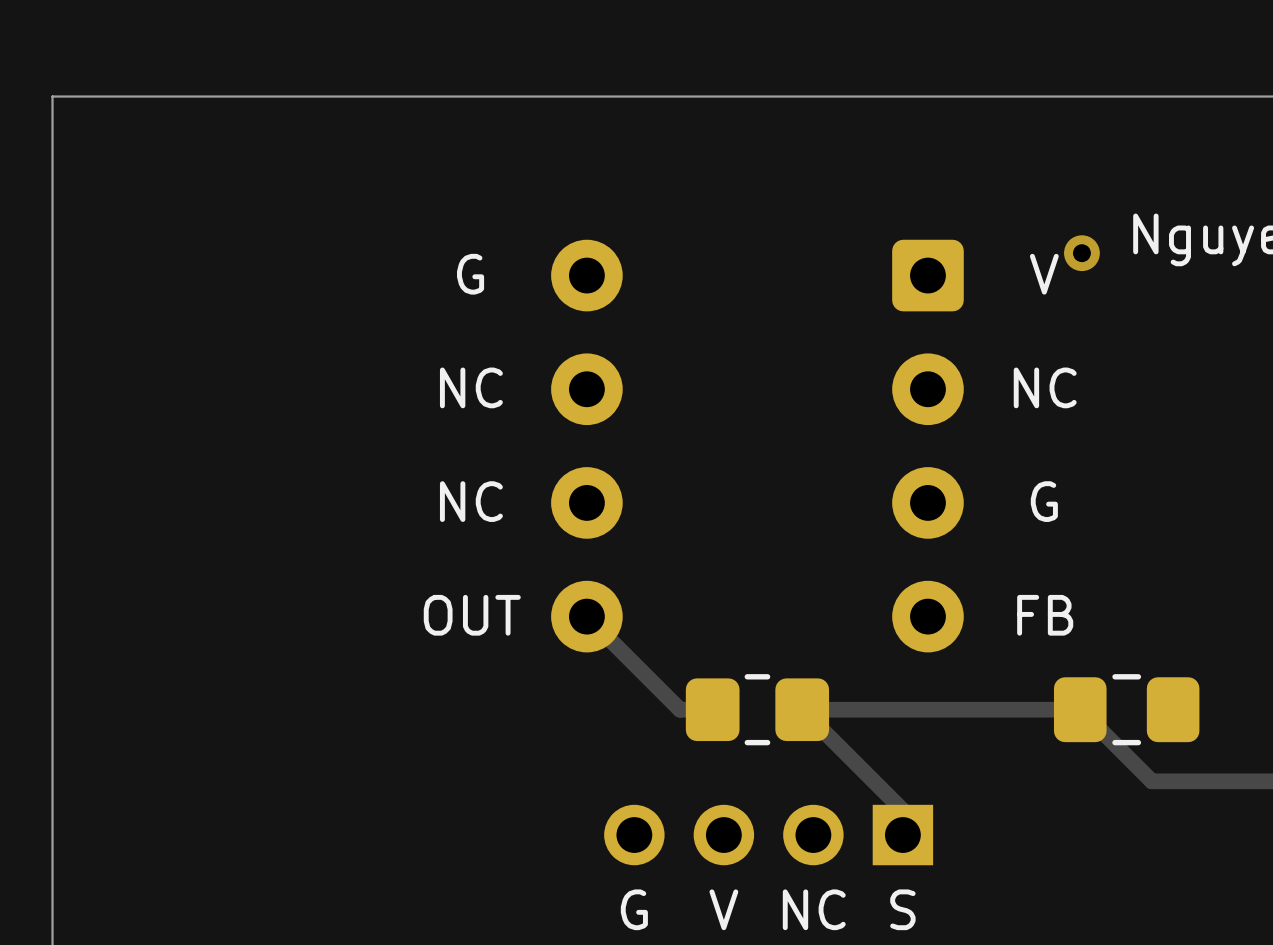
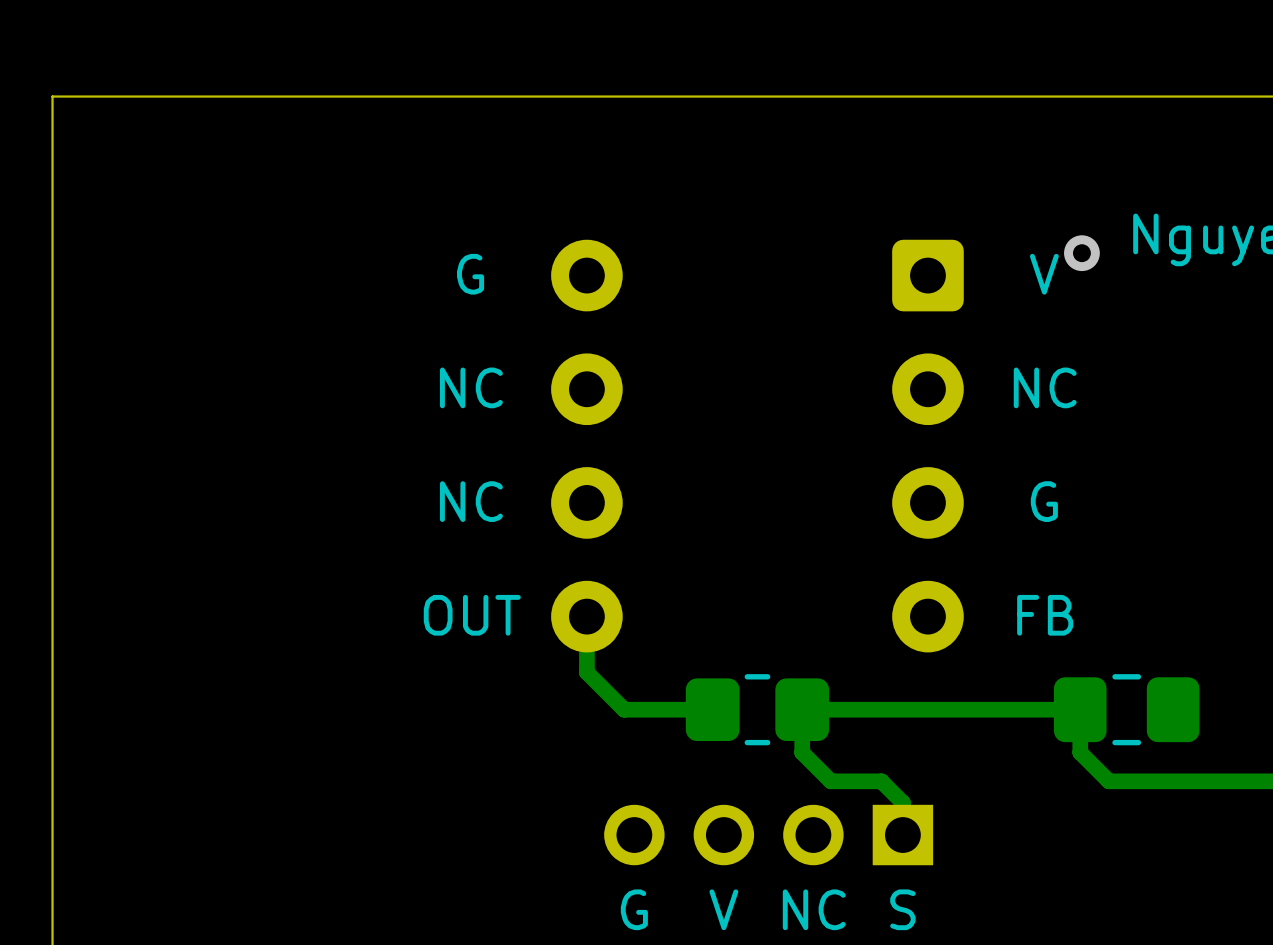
track: (586, 616) (680, 709) -> (586, 616) (586, 672) (624, 709) (680, 709)
track: (802, 709) (902, 810) -> (802, 709) (802, 752) (830, 781) (881, 781) (902, 802) (902, 810)
track: (1080, 709) (1151, 781) -> (1080, 709) (1080, 752) (1108, 781) (1151, 781)

